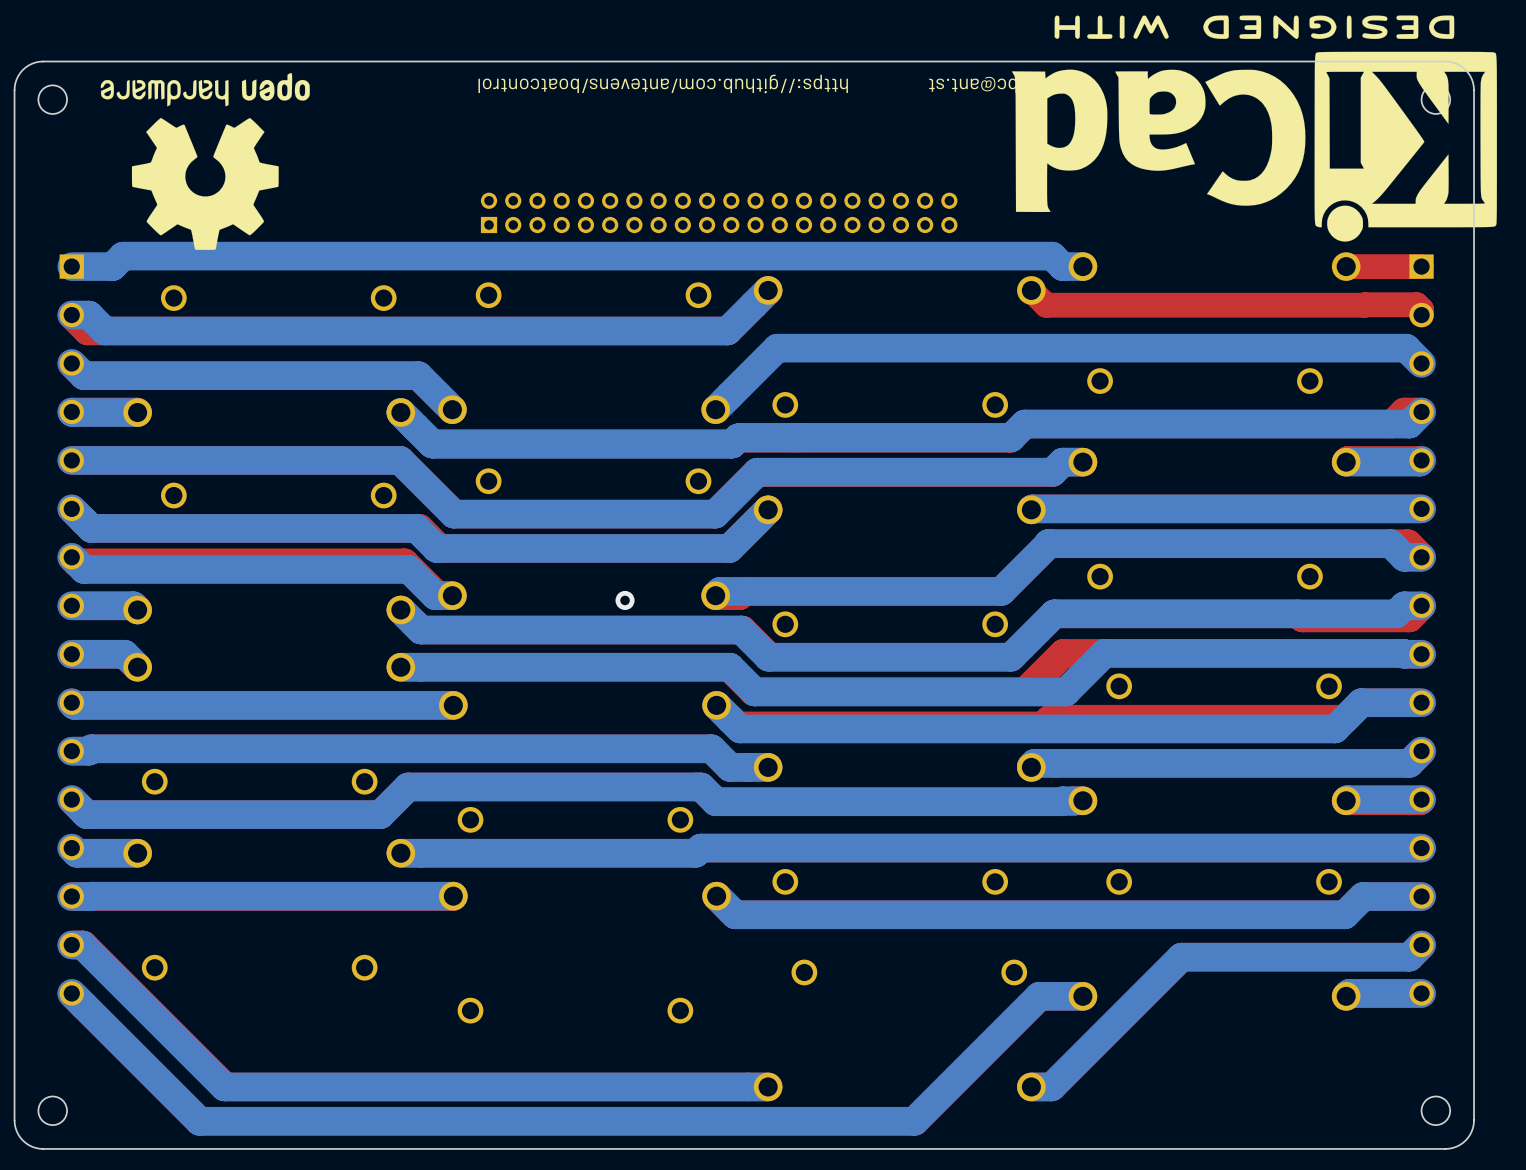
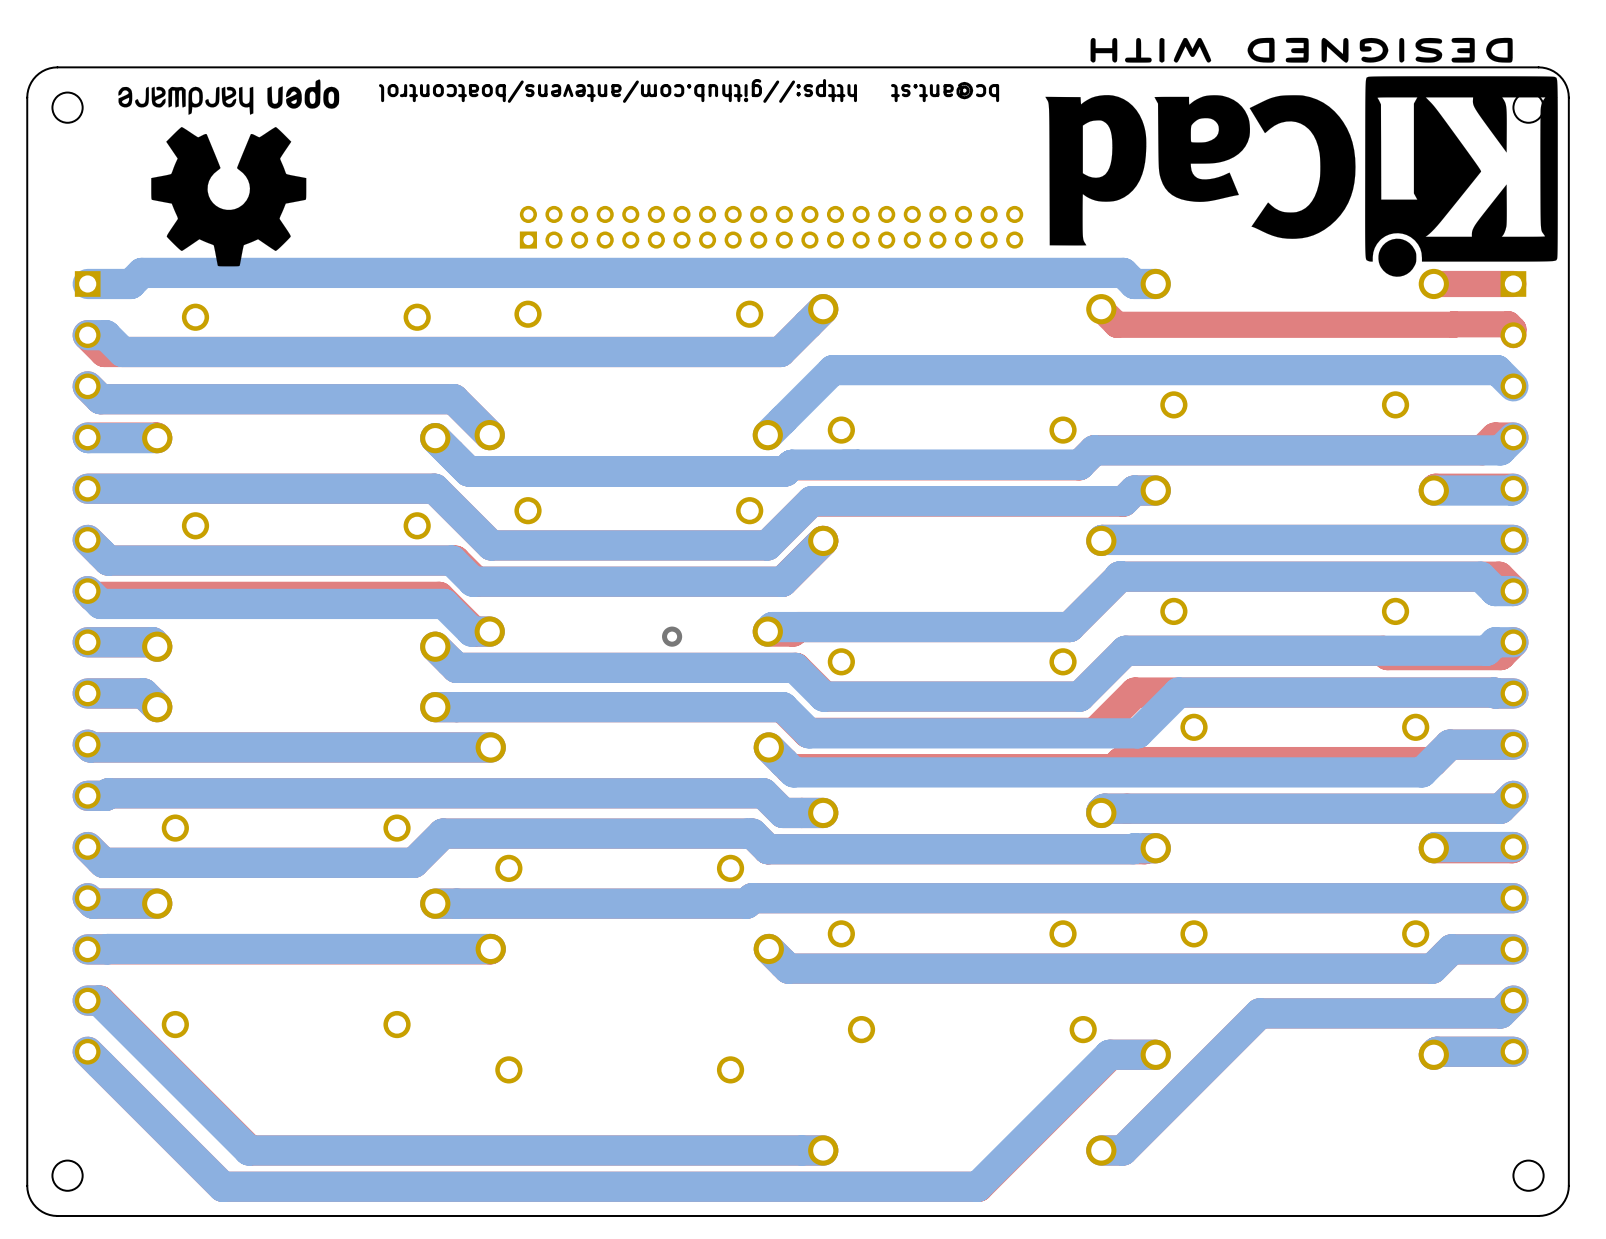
text position: https://github.com/antevens/boatcontrol (663, 83) -> https://github.com/antevens/boatcontrol (617, 90)
text position: bc@ant.st (972, 84) -> bc@ant.st (945, 92)
drawing position: (1254, 128) -> (1301, 157)

